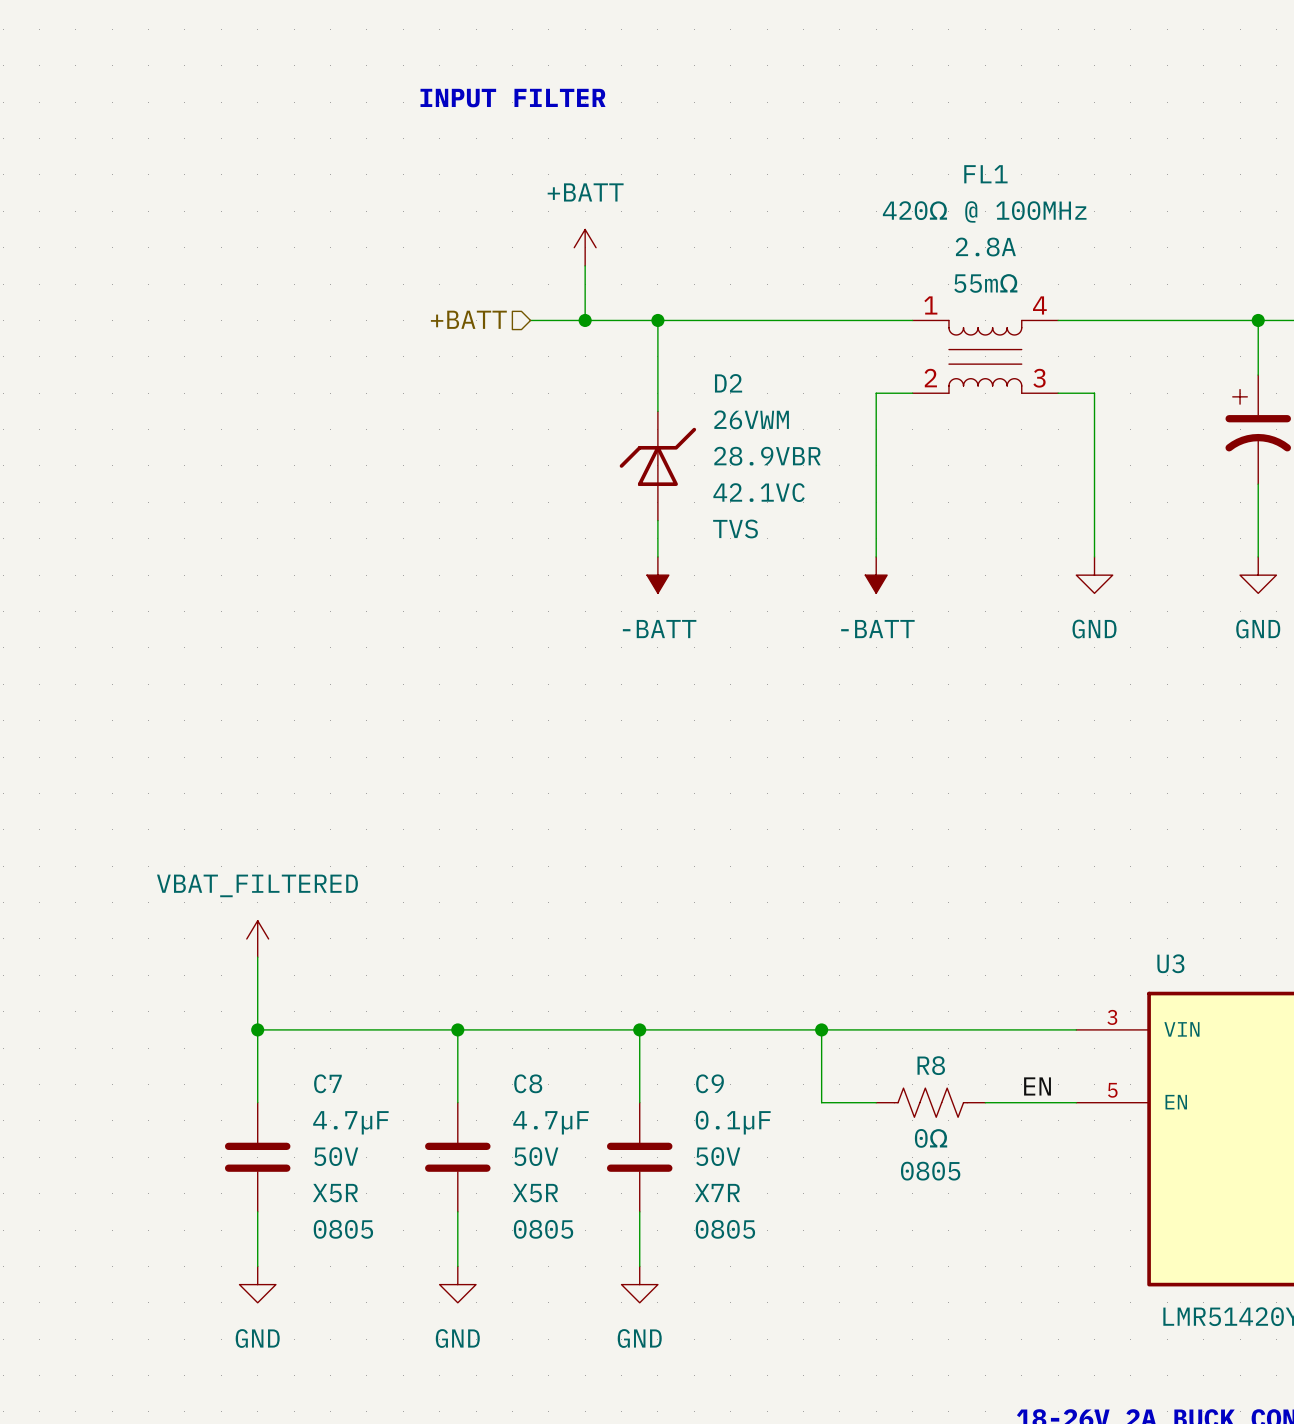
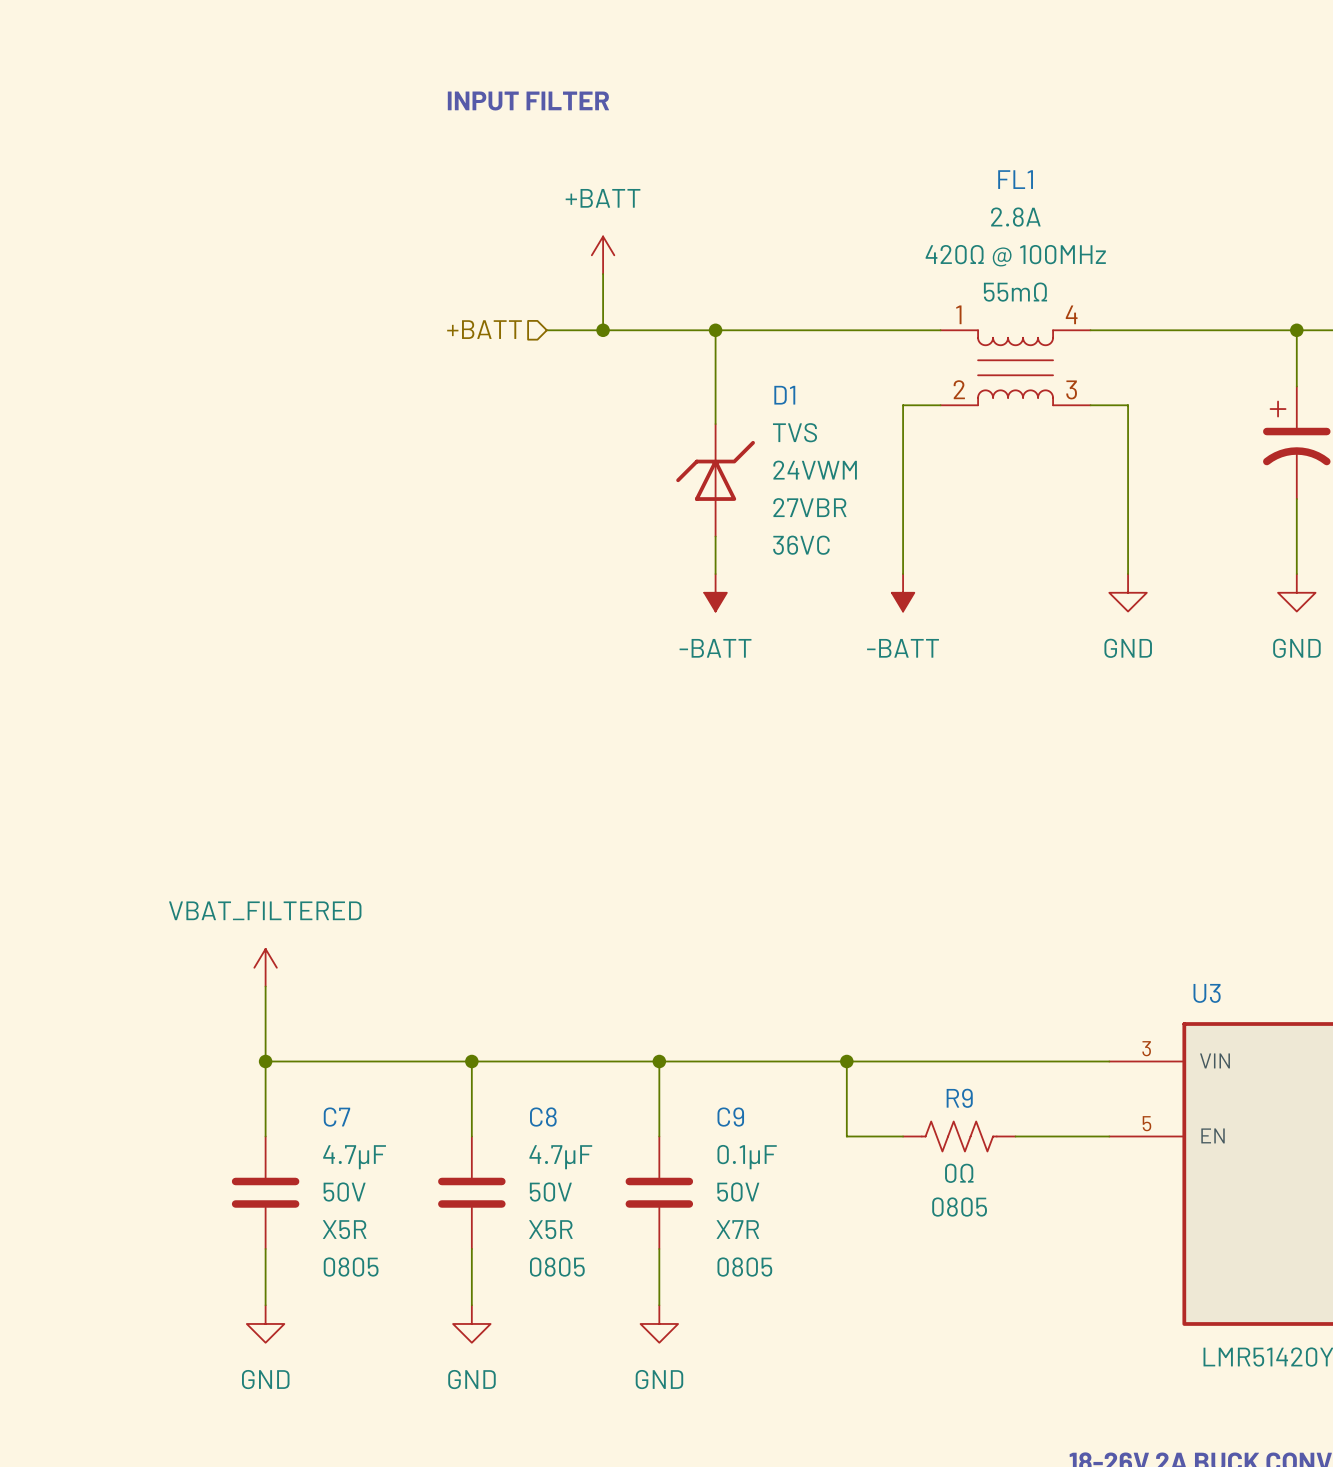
FL1 text position: 420Ω @ 100MHz (984, 211) -> 420Ω @ 100MHz (1015, 255)
FL1 text position: 2.8A (985, 247) -> 2.8A (1015, 217)
wire: (657, 320) (657, 411) -> (715, 330) (715, 424)
junction position: (657, 320) -> (715, 330)
D2: (657, 465) -> none
D1: none -> (715, 480)
wire: (657, 520) (657, 556) -> (715, 536) (715, 574)
power symbol position: -BATT (657, 575) -> -BATT (715, 592)
R8 name: R8 (931, 1065) -> R9 (959, 1098)
label: EN (1037, 1086) -> none

